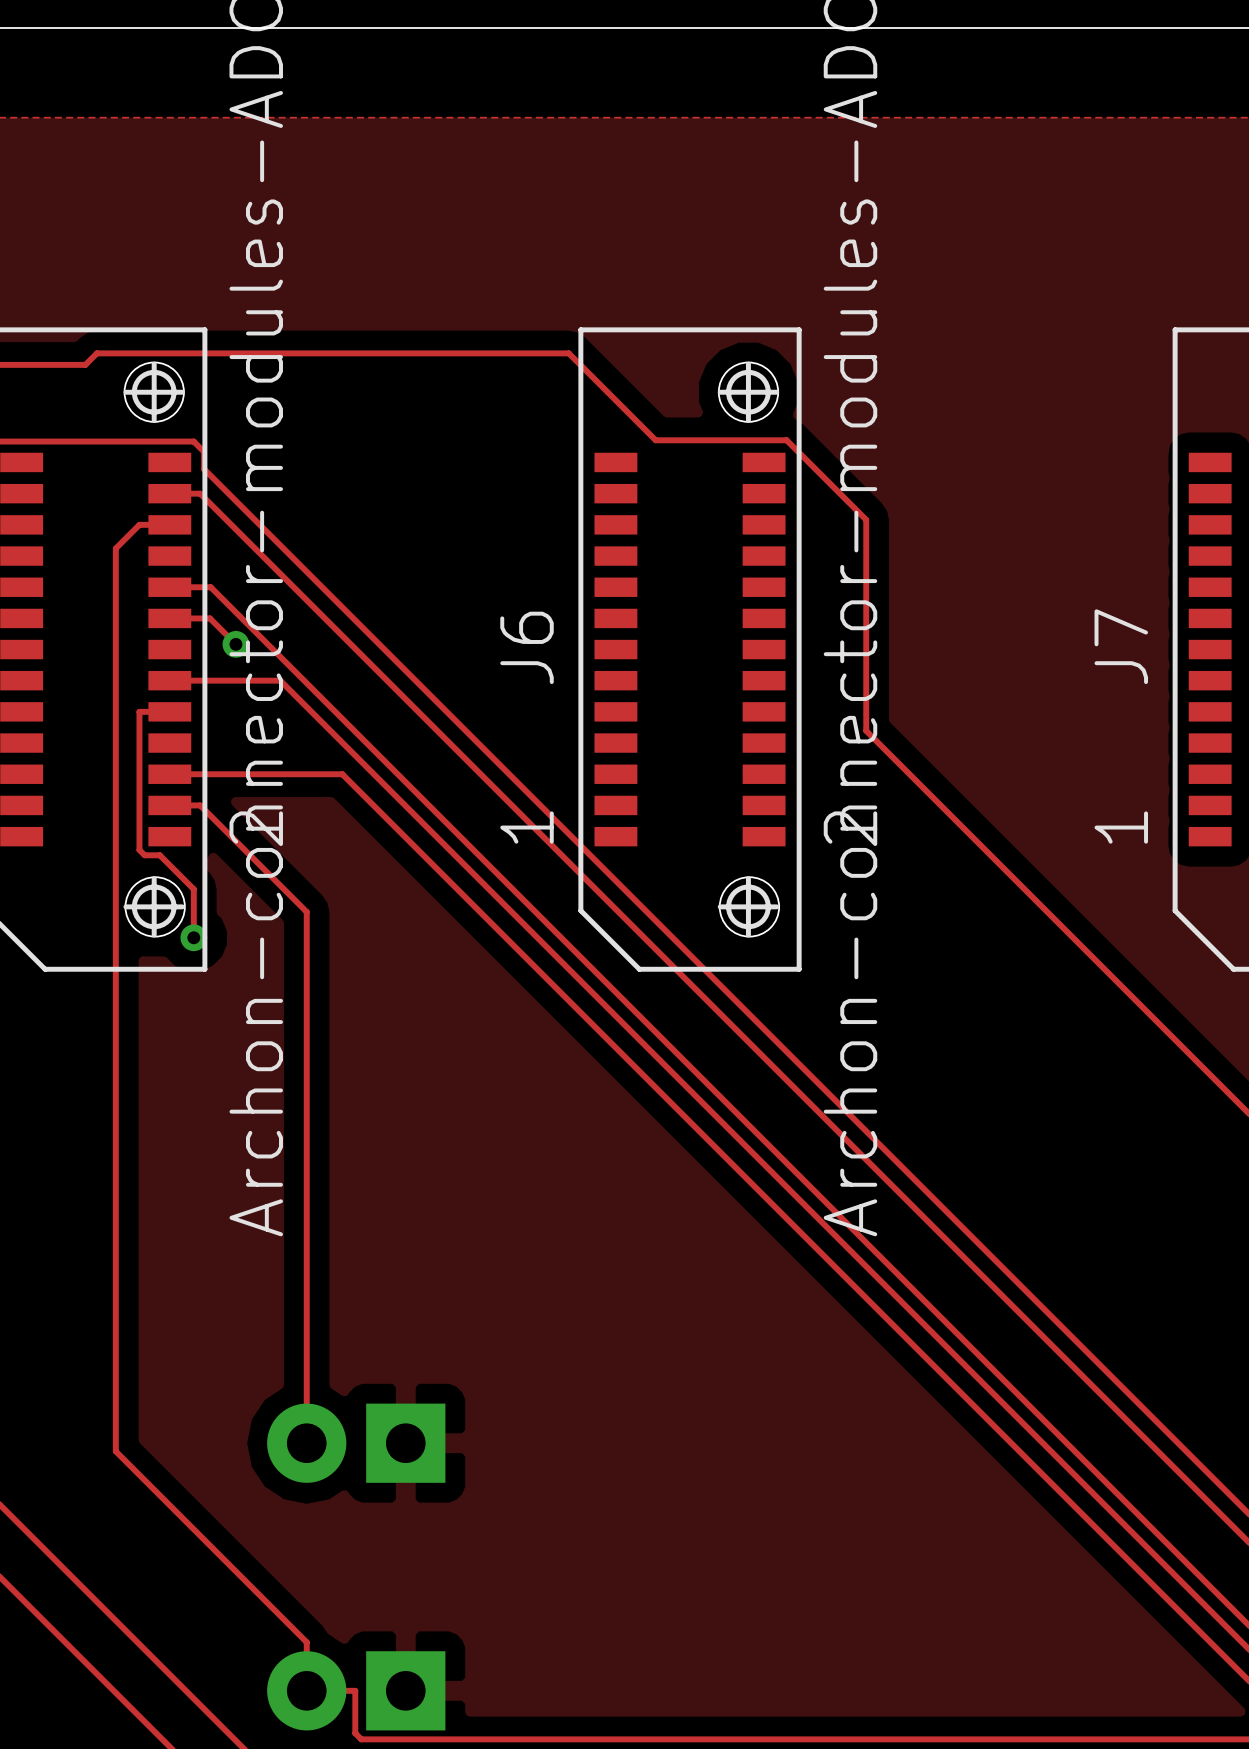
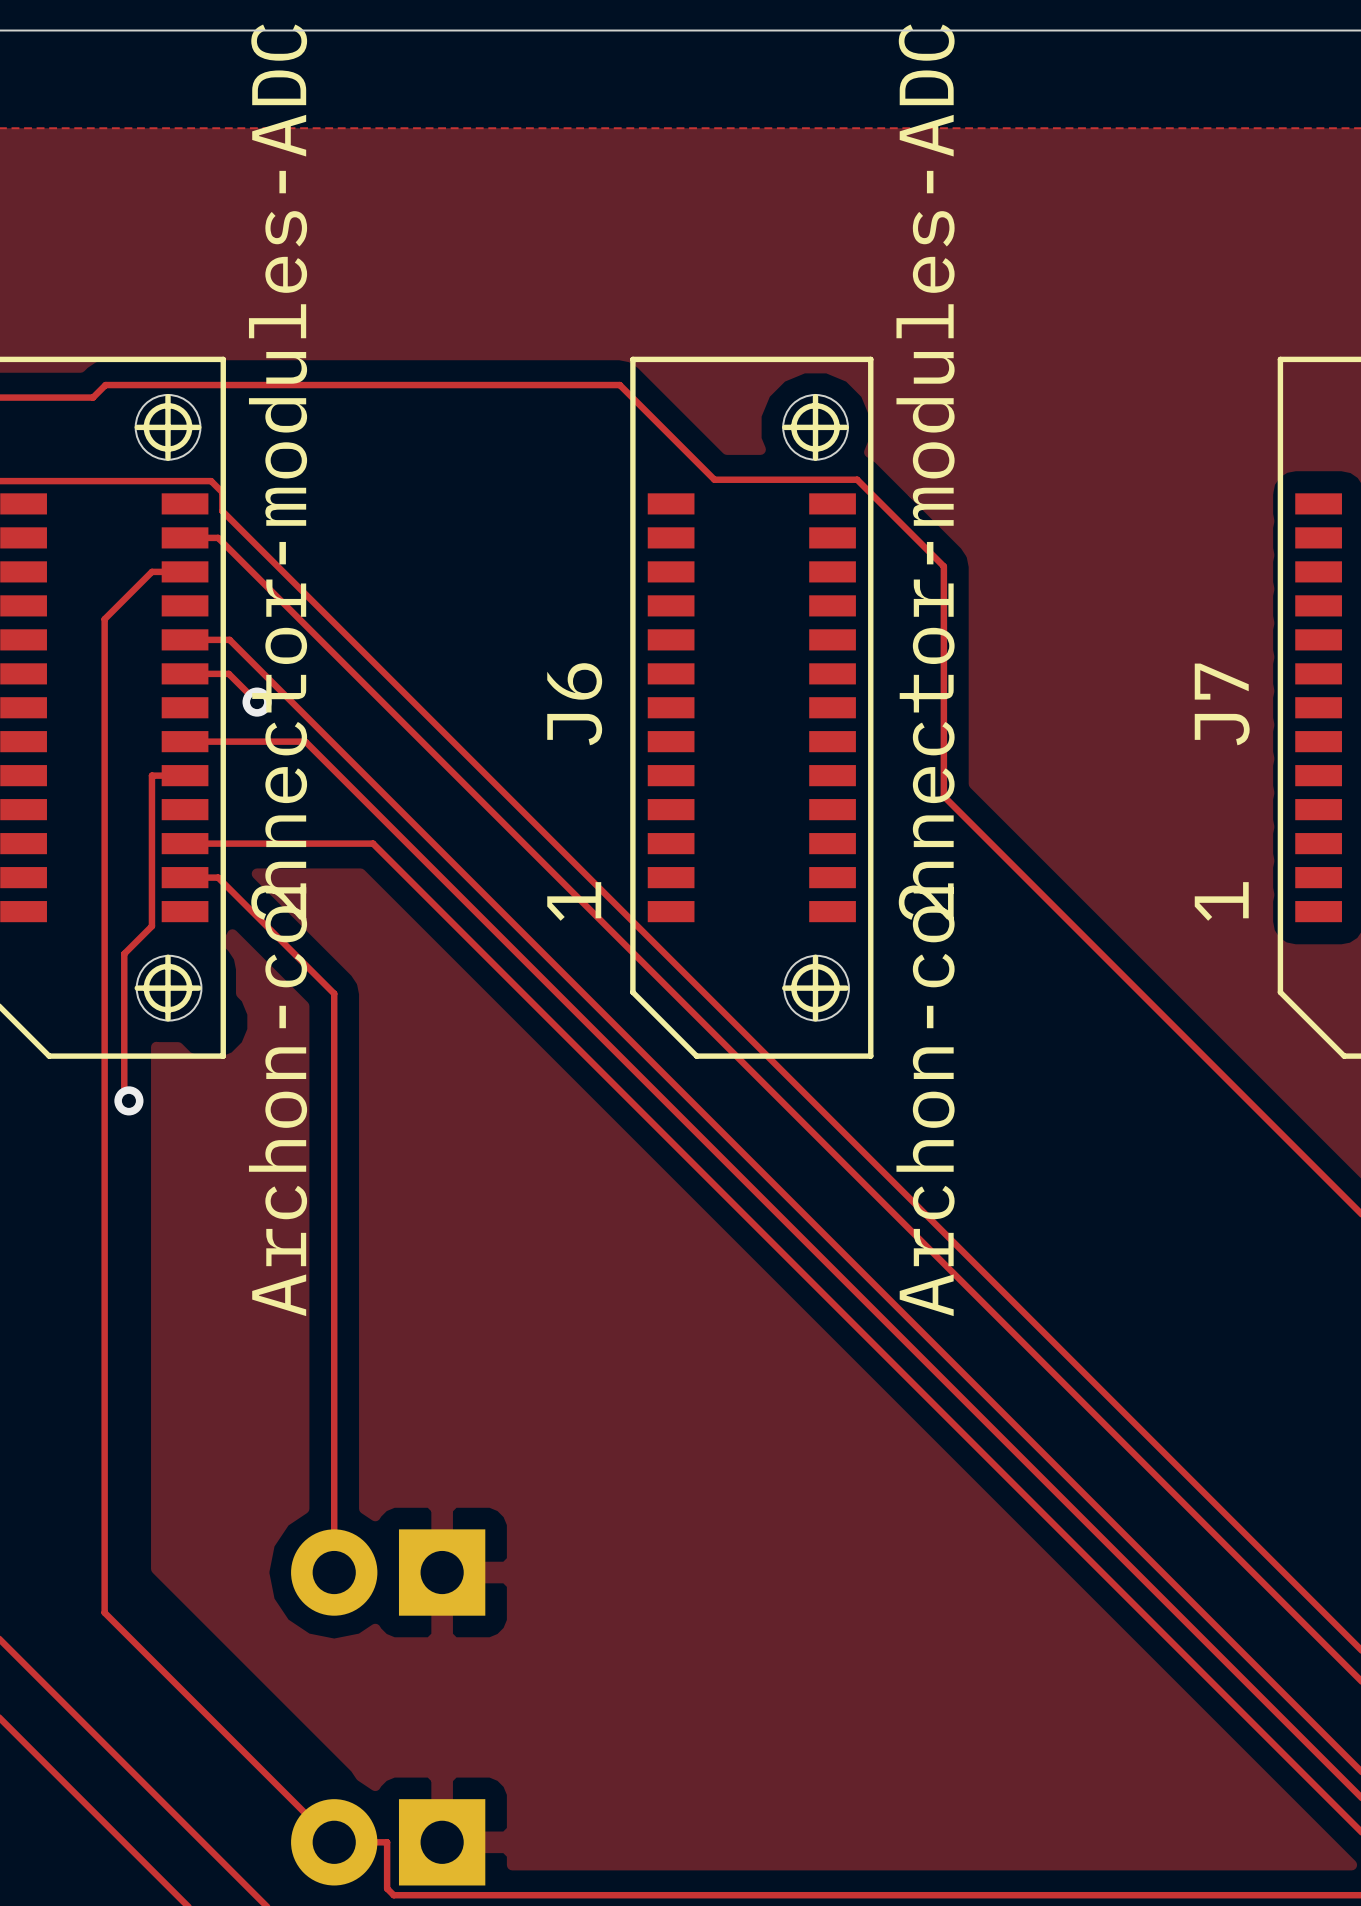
track: (139, 524) (115, 548) (115, 1451) (306, 1642) (306, 1690) -> (151, 571) (104, 619) (104, 1612) (334, 1842)
track: (139, 850) (144, 855) (159, 855) (193, 889) (193, 937) -> (151, 926) (124, 953) (124, 1096) (128, 1100)
via position: (193, 937) -> (128, 1100)

